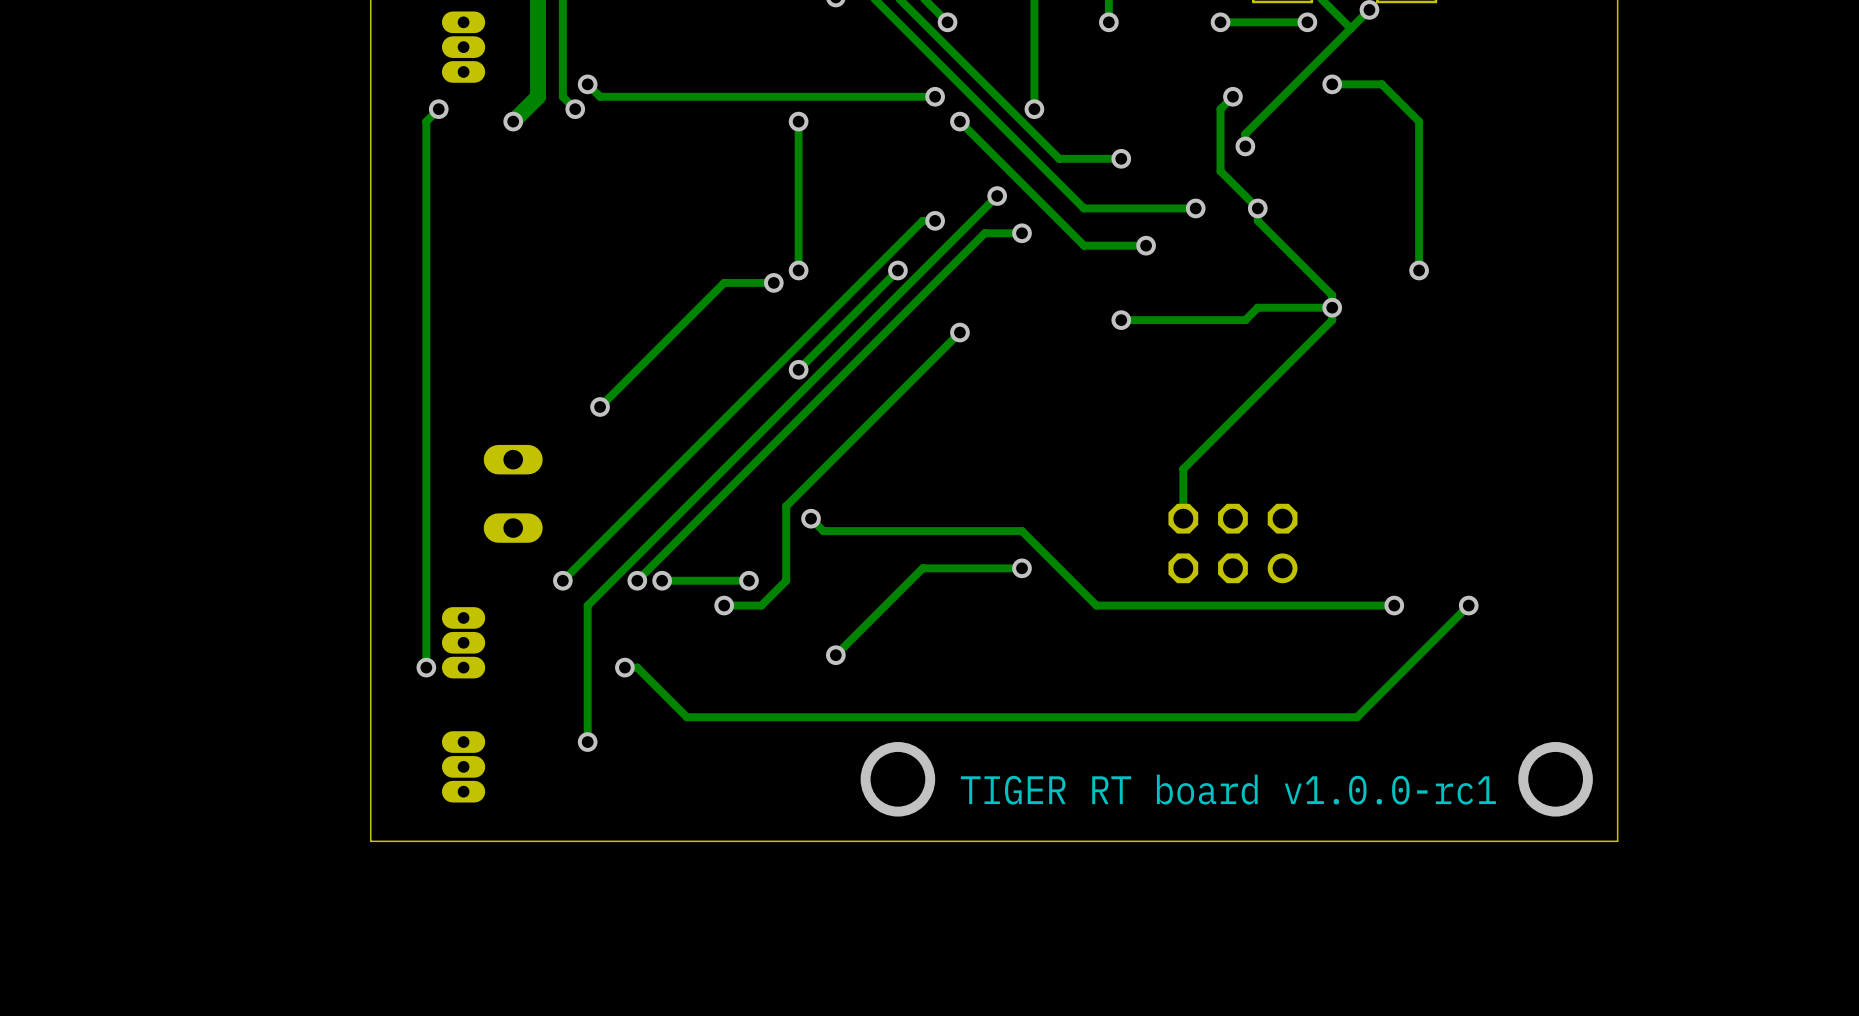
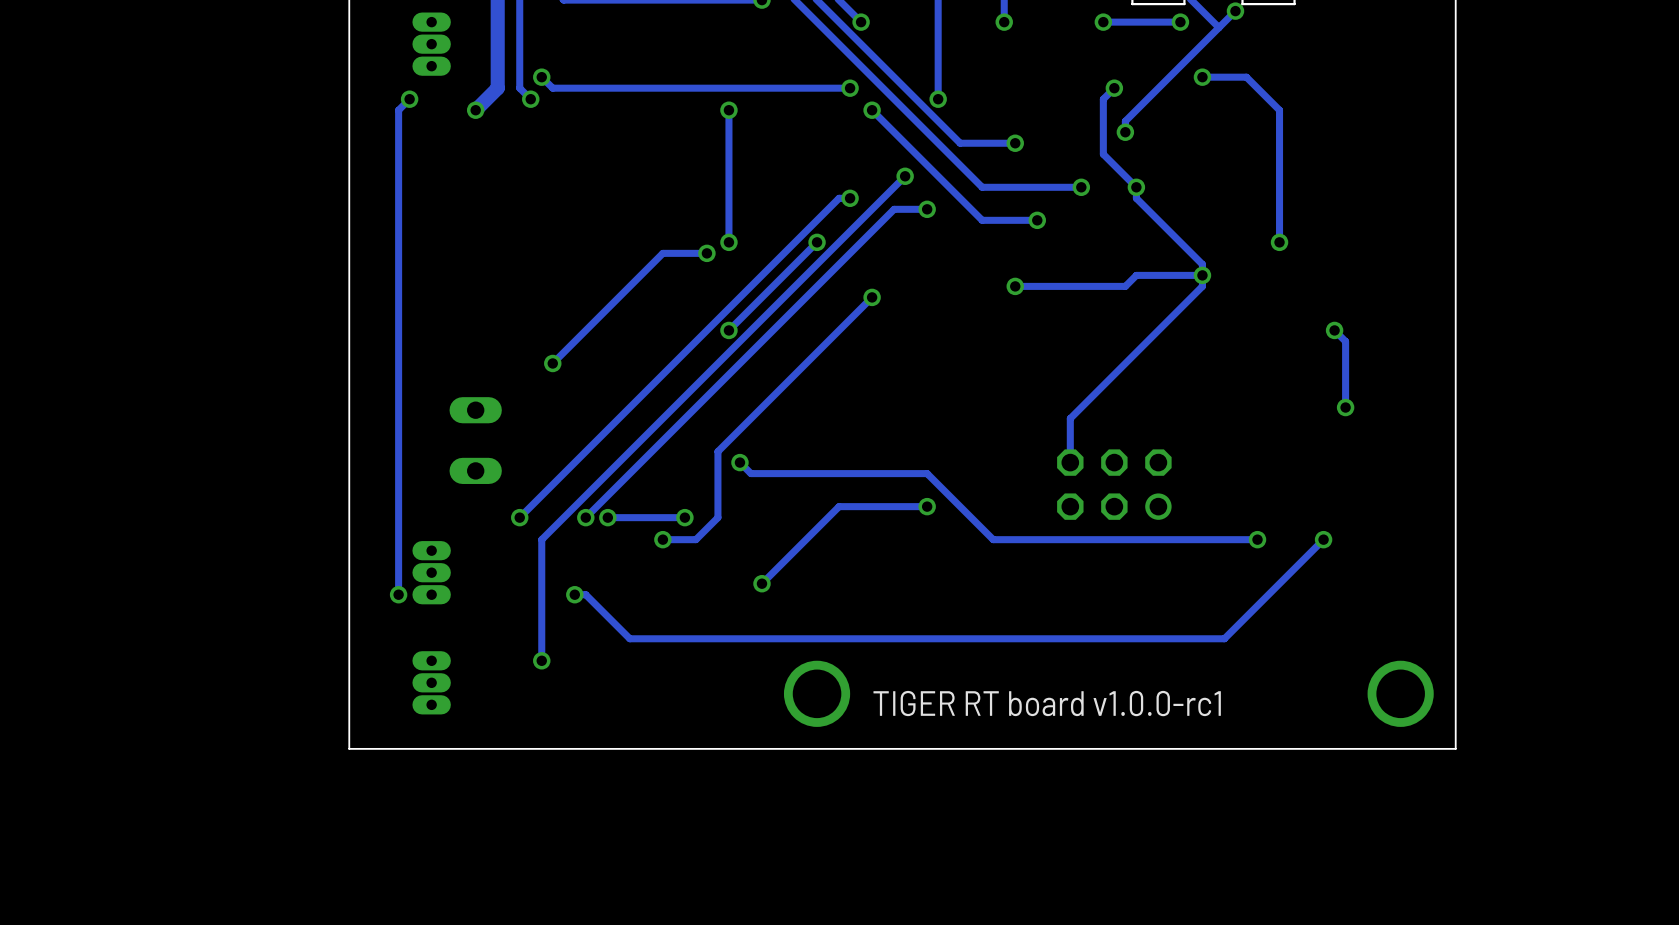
track: none -> (1334, 330) (1345, 341) (1345, 407)
via: none -> (1334, 330)
via: none -> (1345, 407)

